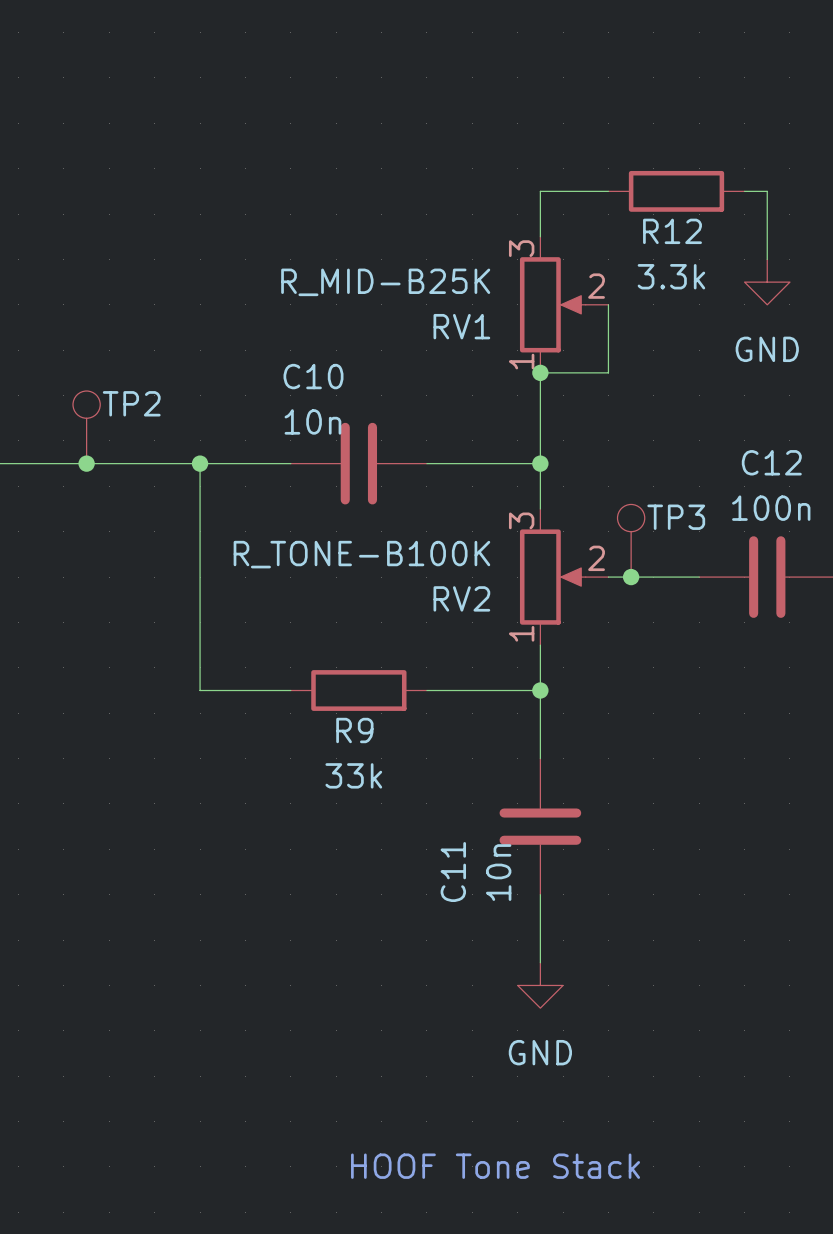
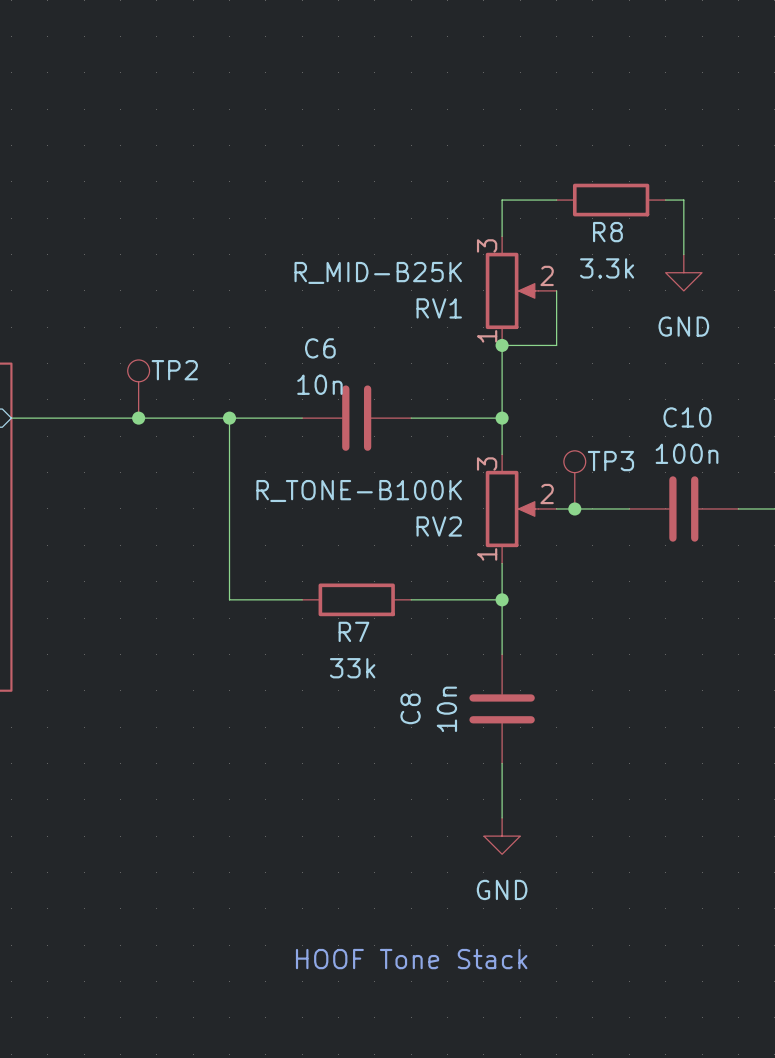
R12 name: R12 (672, 231) -> R8 (607, 232)
C10 name: C10 (313, 376) -> C6 (320, 348)
C12 name: C12 (771, 462) -> C10 (687, 417)
R9 name: R9 (354, 730) -> R7 (353, 631)
C11 name: C11 (453, 872) -> C8 (410, 708)
C11 value position: 10n (498, 872) -> 10n (446, 709)
text position: HOOF Tone Stack (495, 1166) -> HOOF Tone Stack (411, 959)

